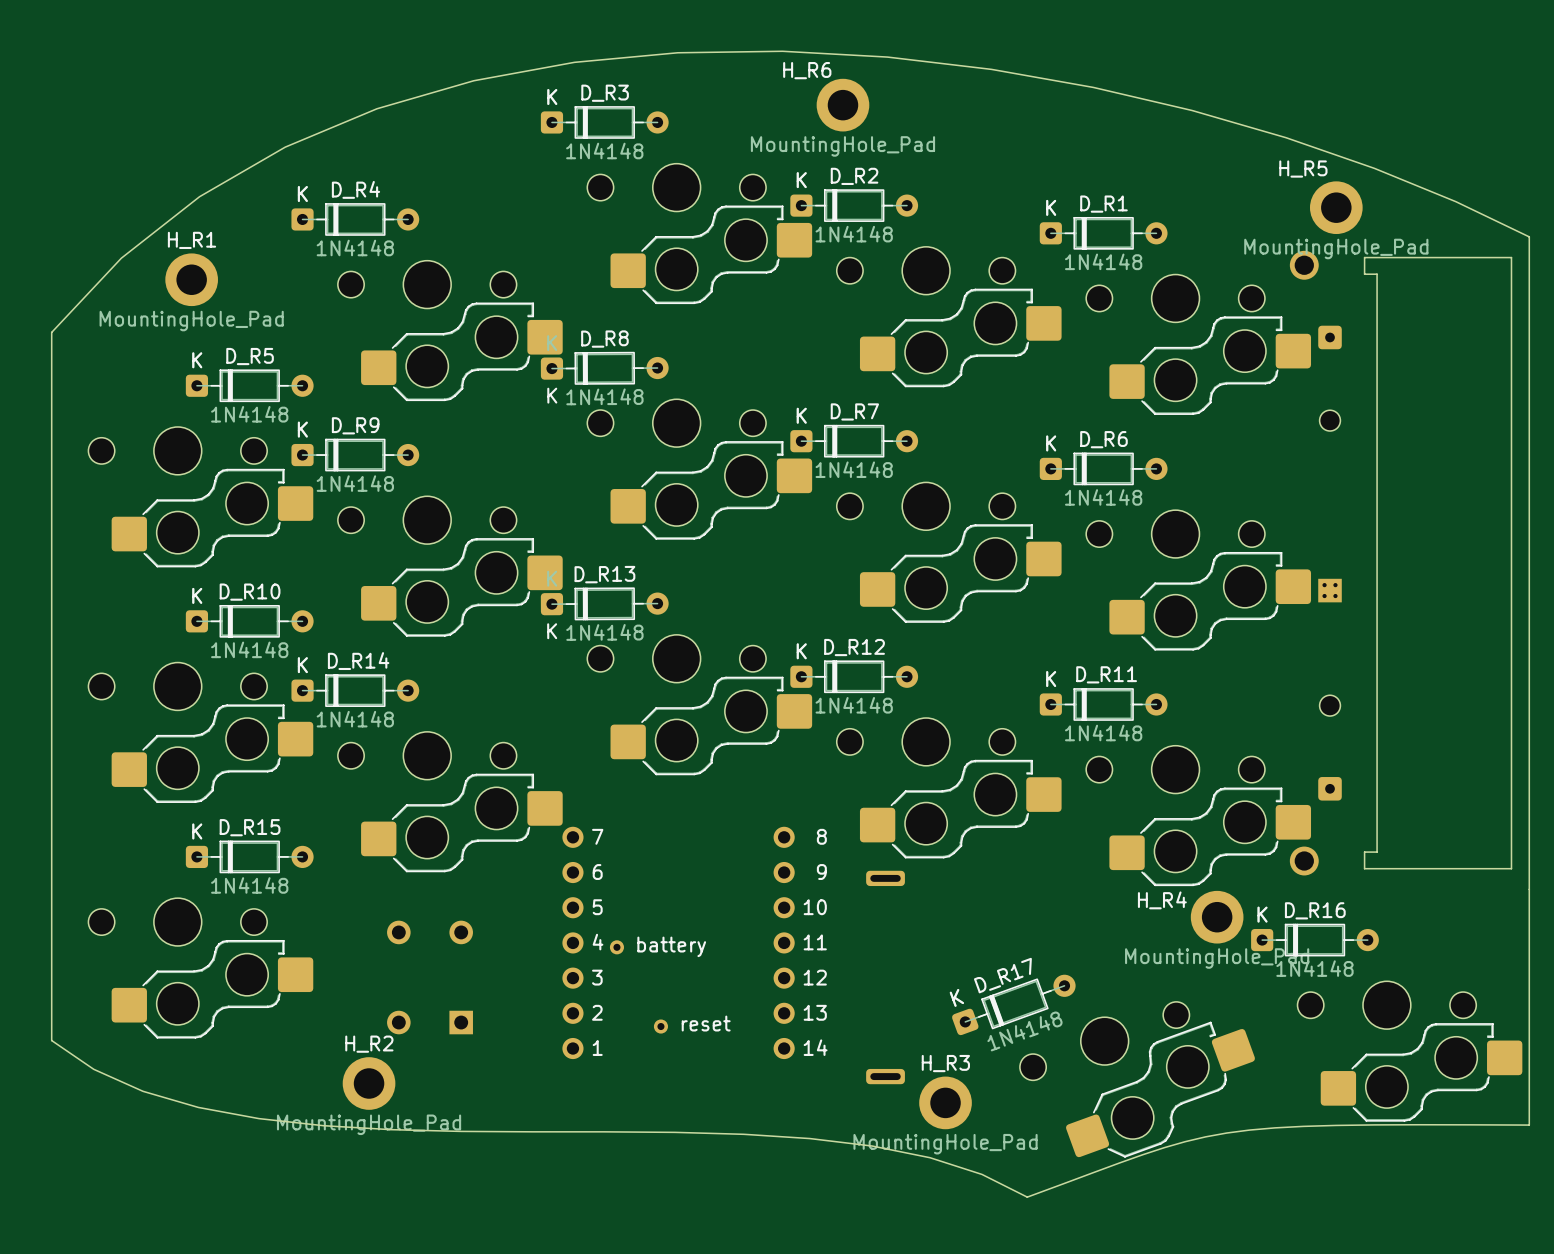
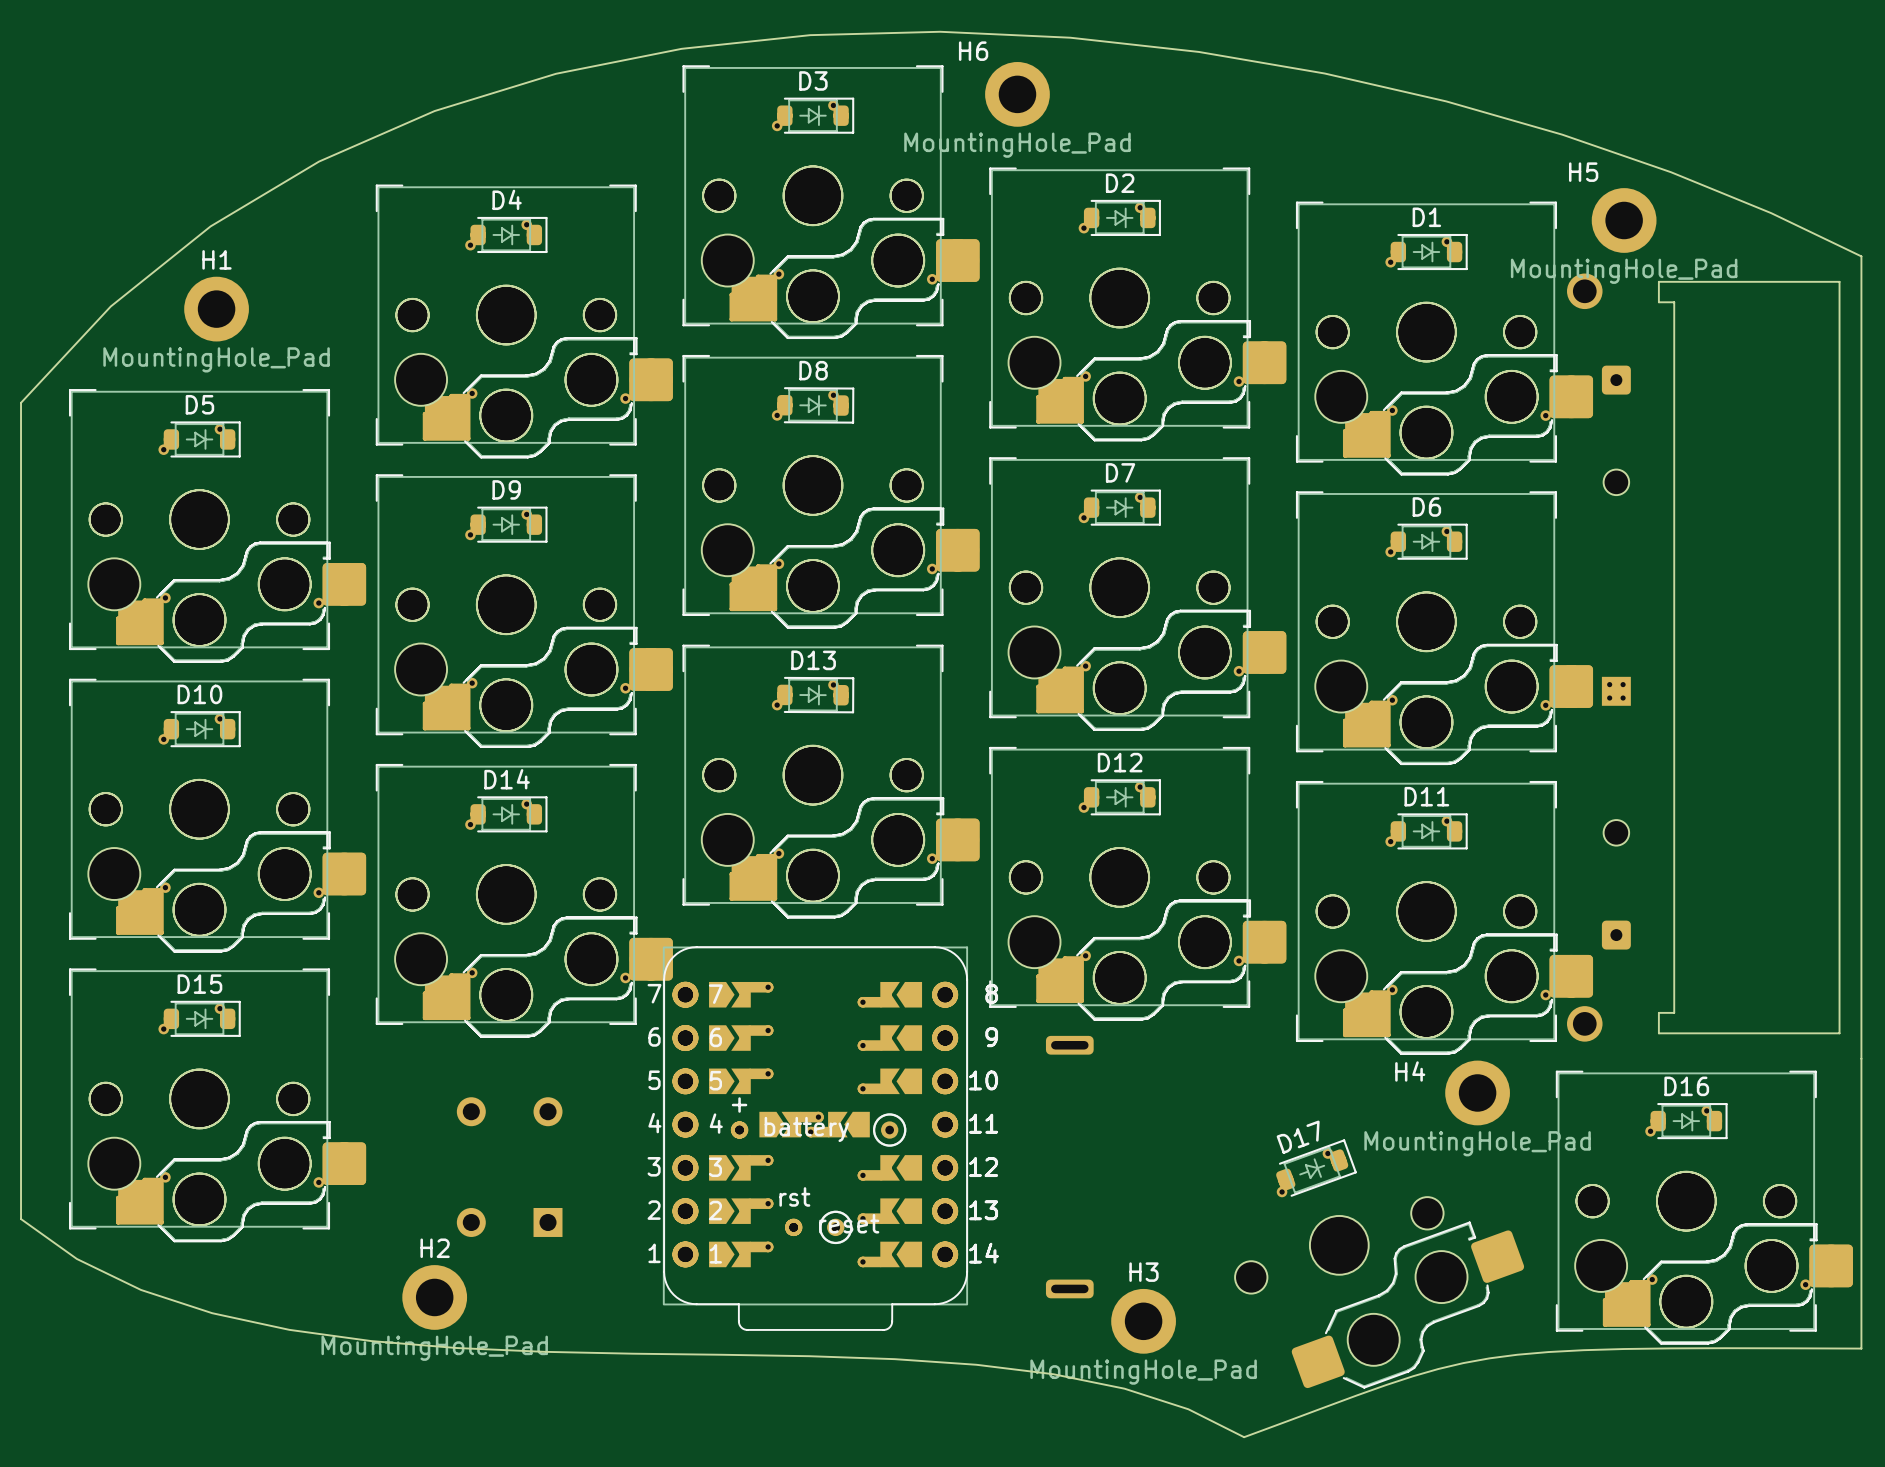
H_R6 name: H_R6 (807, 70) -> H6 (973, 51)
D_R3: 1N4148 (604, 122) -> none
D3: none -> (813, 115)
H_R5 name: H_R5 (1303, 169) -> H5 (1583, 172)
part: none -> (831, 202)
D_R2: 1N4148 (854, 205) -> none
D2: none -> (1119, 217)
D_R4: 1N4148 (355, 219) -> none
D4: none -> (506, 234)
D_R1: 1N4148 (1103, 233) -> none
D1: none -> (1426, 252)
board edge: (1529, 236) (1455, 201) (1374, 168) (1286, 137) (1192, 110) (1093, 87) (991, 69) (887, 57) (782, 51) (677, 52) (574, 62) (473, 80) (377, 108) (285, 147) (199, 196) (121, 258) (51, 332) (51, 1040) (93, 1069) (143, 1091) (198, 1107) (258, 1118) (323, 1125) (391, 1129) (674, 1132) (809, 1138) (872, 1146) (930, 1157) (982, 1174) (1027, 1197) -> (1861, 256) (1771, 213) (1671, 172) (1562, 134) (1446, 101) (1324, 73) (1198, 51) (1070, 37) (940, 31) (810, 35) (681, 48) (555, 73) (434, 111) (319, 161) (210, 226) (110, 306) (21, 402) (21, 1219) (76, 1258) (141, 1289) (212, 1313) (289, 1329) (371, 1341) (456, 1348) (544, 1351) (809, 1356) (976, 1364) (1053, 1374) (1124, 1388) (1188, 1409) (1244, 1437)
H_R1 name: H_R1 (191, 240) -> H1 (216, 259)
part: none -> (1137, 304)
part: none -> (524, 321)
part: none -> (1444, 338)
D8: none -> (813, 405)
D_R8: 1N4148 (604, 368) -> none
D5: none -> (199, 439)
D_R5: 1N4148 (249, 385) -> none
part: none -> (831, 491)
D_R7: 1N4148 (854, 441) -> none
D7: none -> (1119, 507)
D_R9: 1N4148 (355, 455) -> none
D9: none -> (506, 524)
part: none -> (217, 525)
D_R6: 1N4148 (1103, 468) -> none
D6: none -> (1426, 541)
part: none -> (1137, 594)
part: none -> (524, 611)
part: none -> (1444, 628)
D13: none -> (813, 695)
D_R13: 1N4148 (604, 603) -> none
D10: none -> (199, 729)
D_R10: 1N4148 (249, 621) -> none
part: none -> (831, 781)
D_R12: 1N4148 (854, 676) -> none
D12: none -> (1119, 797)
D_R14: 1N4148 (355, 690) -> none
D14: none -> (506, 814)
part: none -> (217, 815)
D_R11: 1N4148 (1103, 704) -> none
D11: none -> (1426, 831)
part: none -> (1137, 883)
part: none -> (524, 900)
part: none -> (1444, 917)
part: none -> (741, 994)
part: none -> (889, 994)
D15: none -> (199, 1018)
D_R15: 1N4148 (249, 856) -> none
part: none -> (741, 1038)
part: none -> (889, 1038)
H_R4 name: H_R4 (1162, 900) -> H4 (1410, 1071)
part: none -> (741, 1081)
part: none -> (889, 1081)
part: none -> (217, 1105)
D_R16: 1N4148 (1314, 940) -> none
D16: none -> (1686, 1121)
part: none -> (791, 1124)
part: none -> (837, 1124)
part: none -> (815, 1138)
part: none -> (741, 1167)
part: none -> (889, 1167)
D17: none -> (1316, 1168)
D_R17: 1N4148 (1013, 1004) -> none
part: none -> (1704, 1207)
part: none -> (741, 1211)
part: none -> (889, 1211)
H_R2 name: H_R2 (369, 1044) -> H2 (435, 1248)
part: none -> (741, 1254)
part: none -> (889, 1254)
H_R3 name: H_R3 (945, 1063) -> H3 (1143, 1272)

